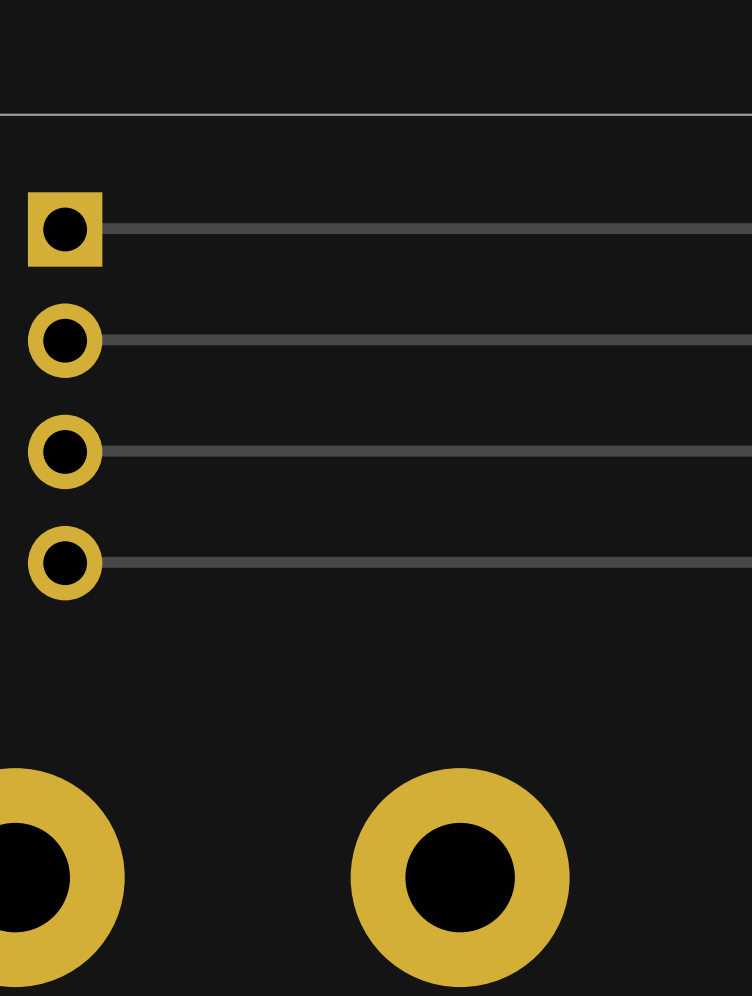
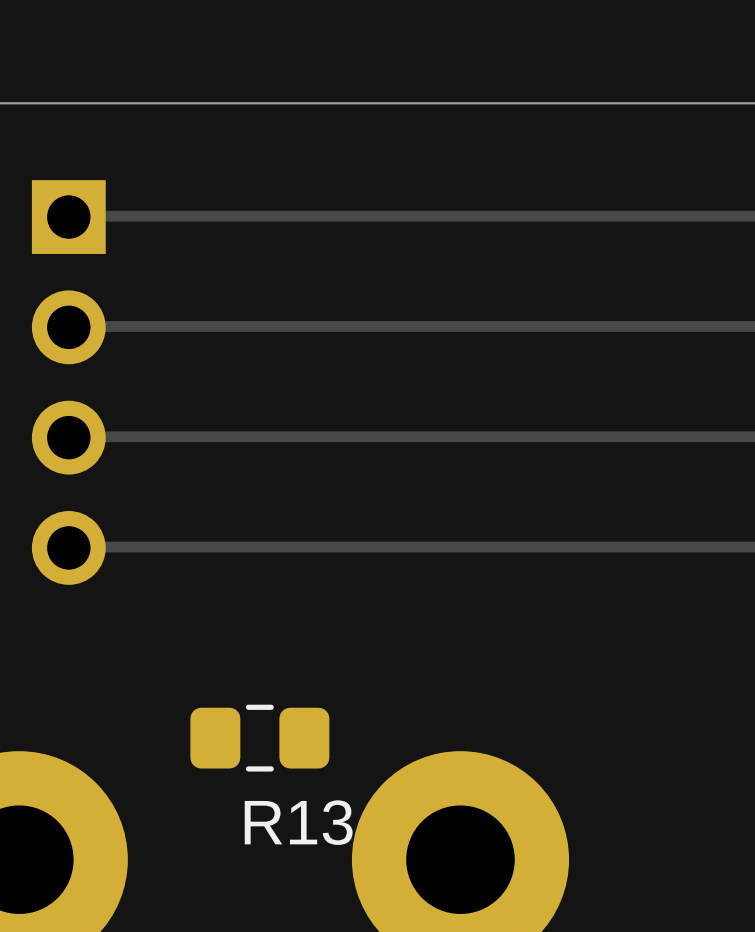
R13: none -> (259, 738)

